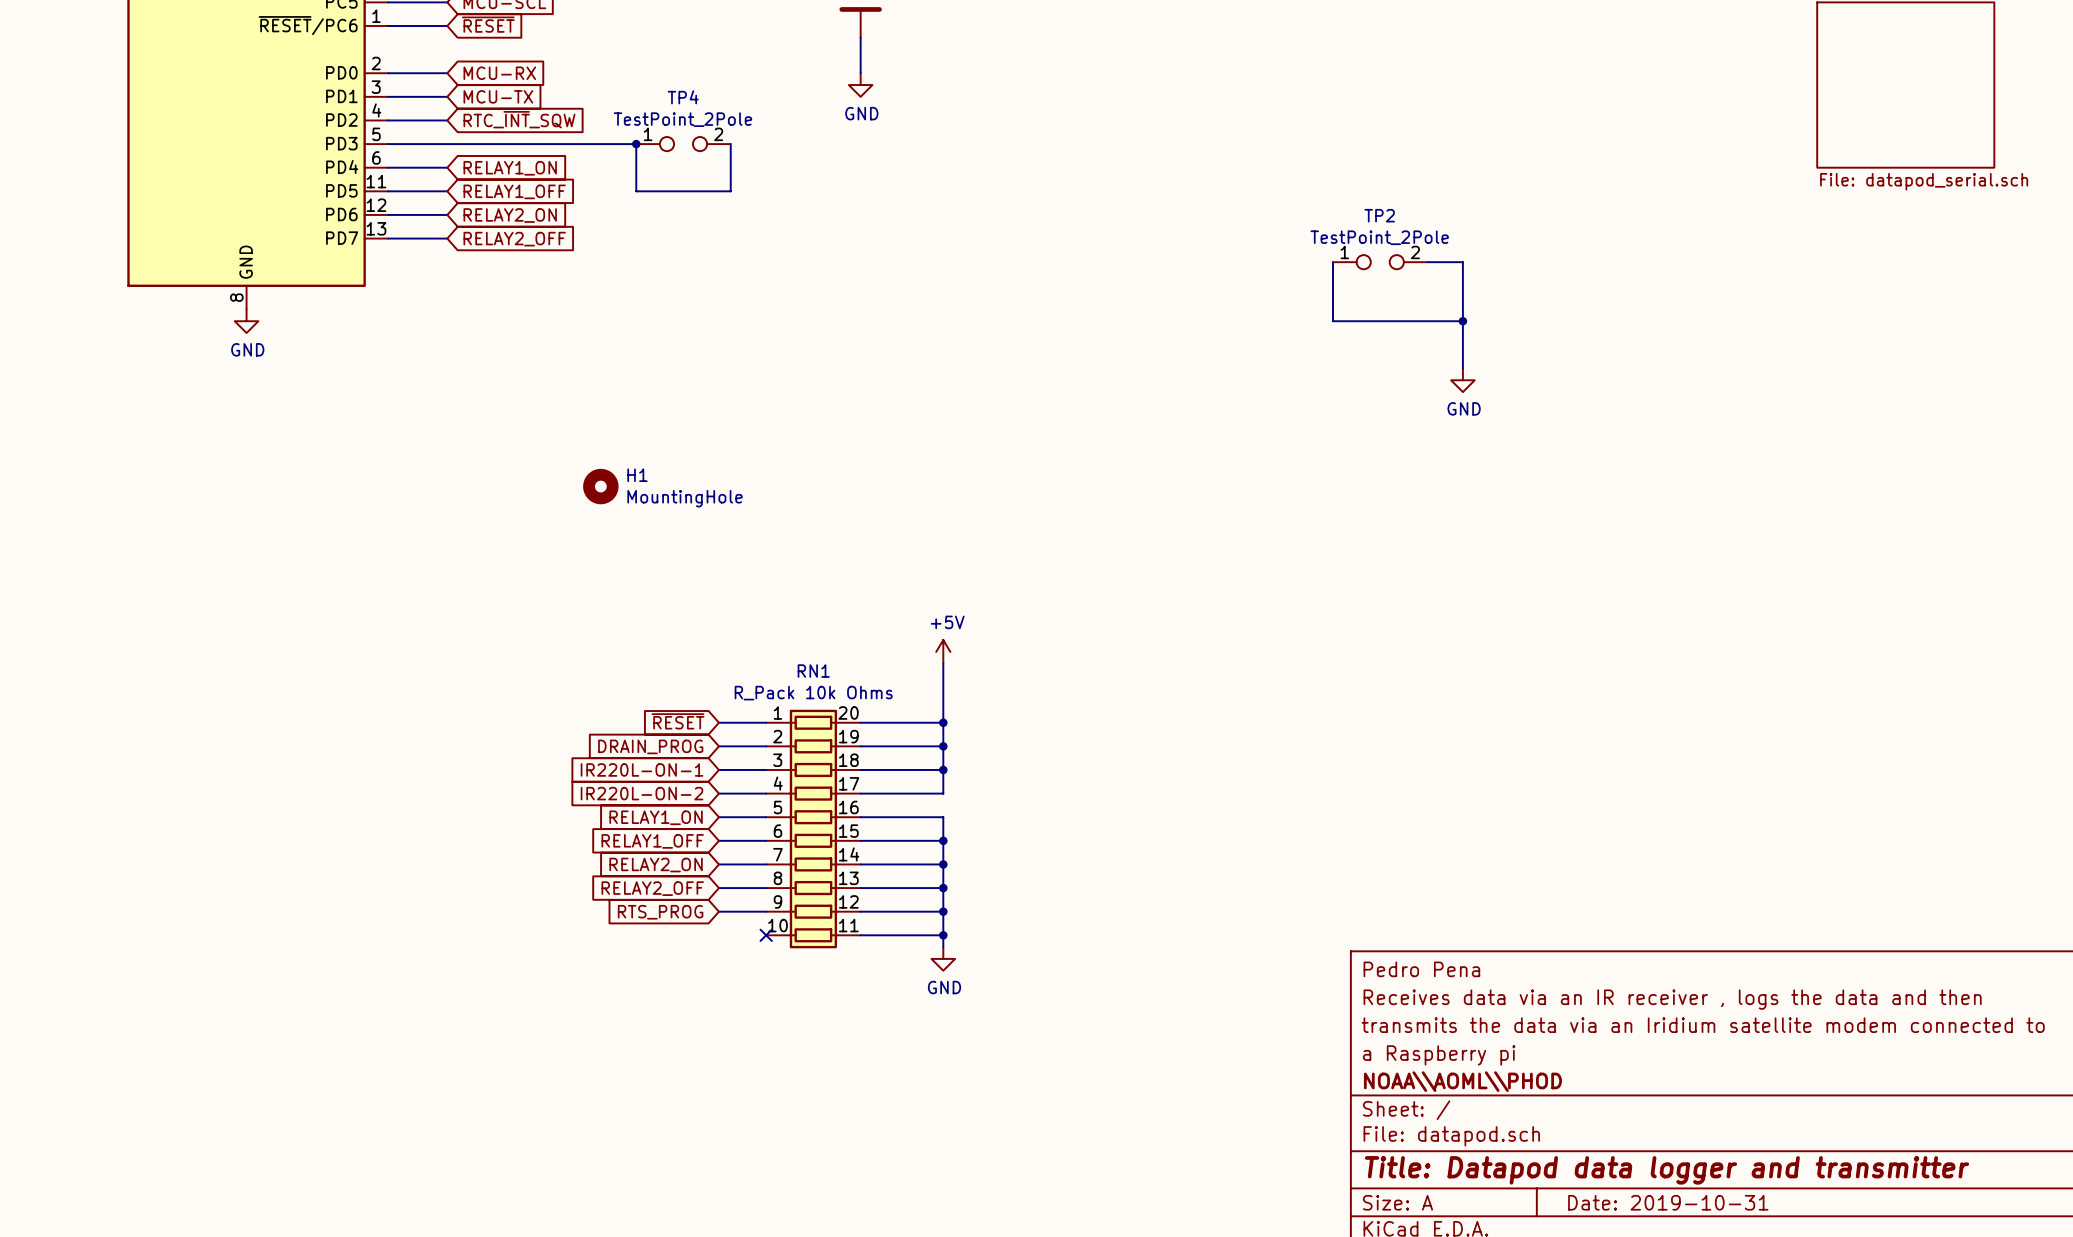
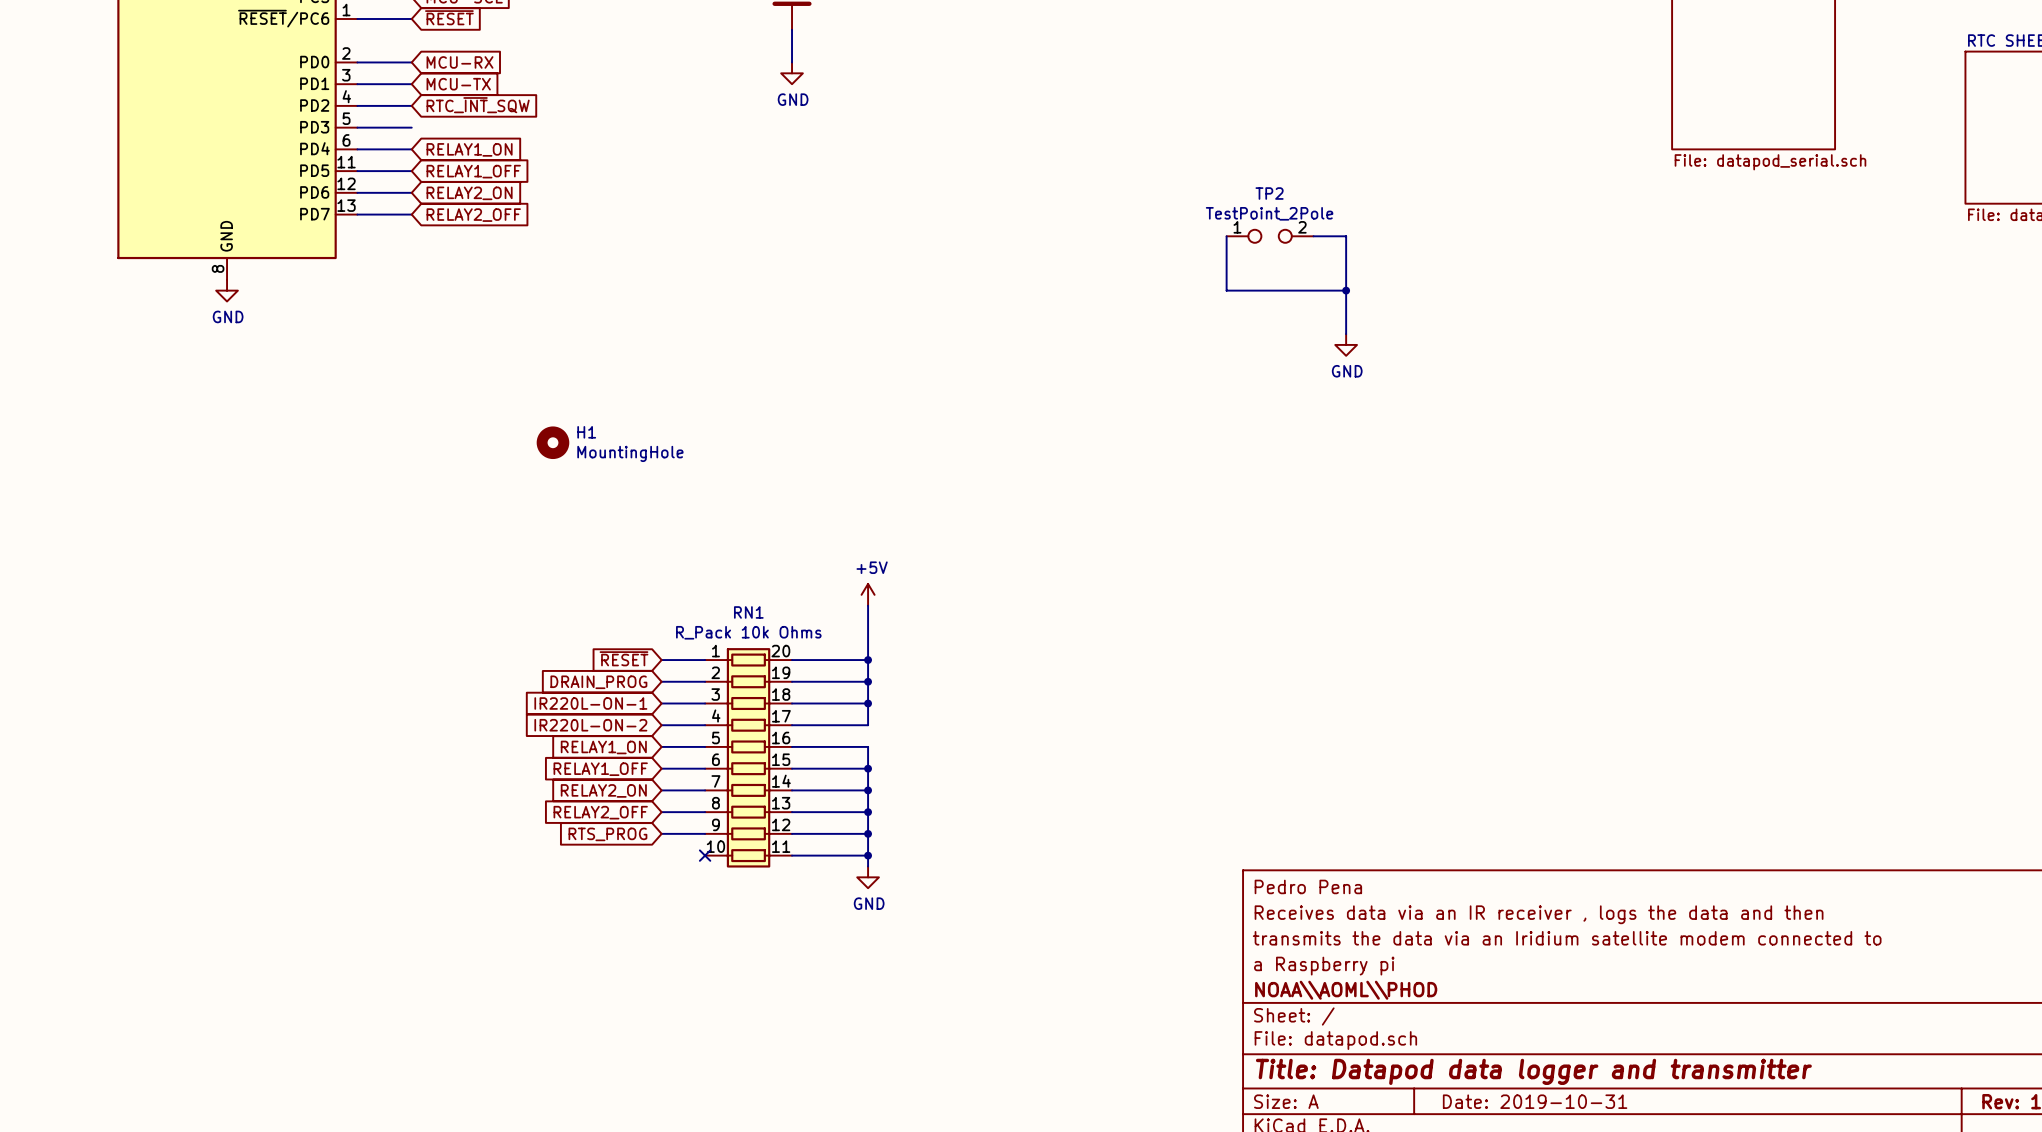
wire: (447, 144) (636, 144) (636, 191) (730, 191) (730, 144) -> none
junction: (636, 144) -> none
TP4: TestPoint_2Pole (683, 144) -> none

